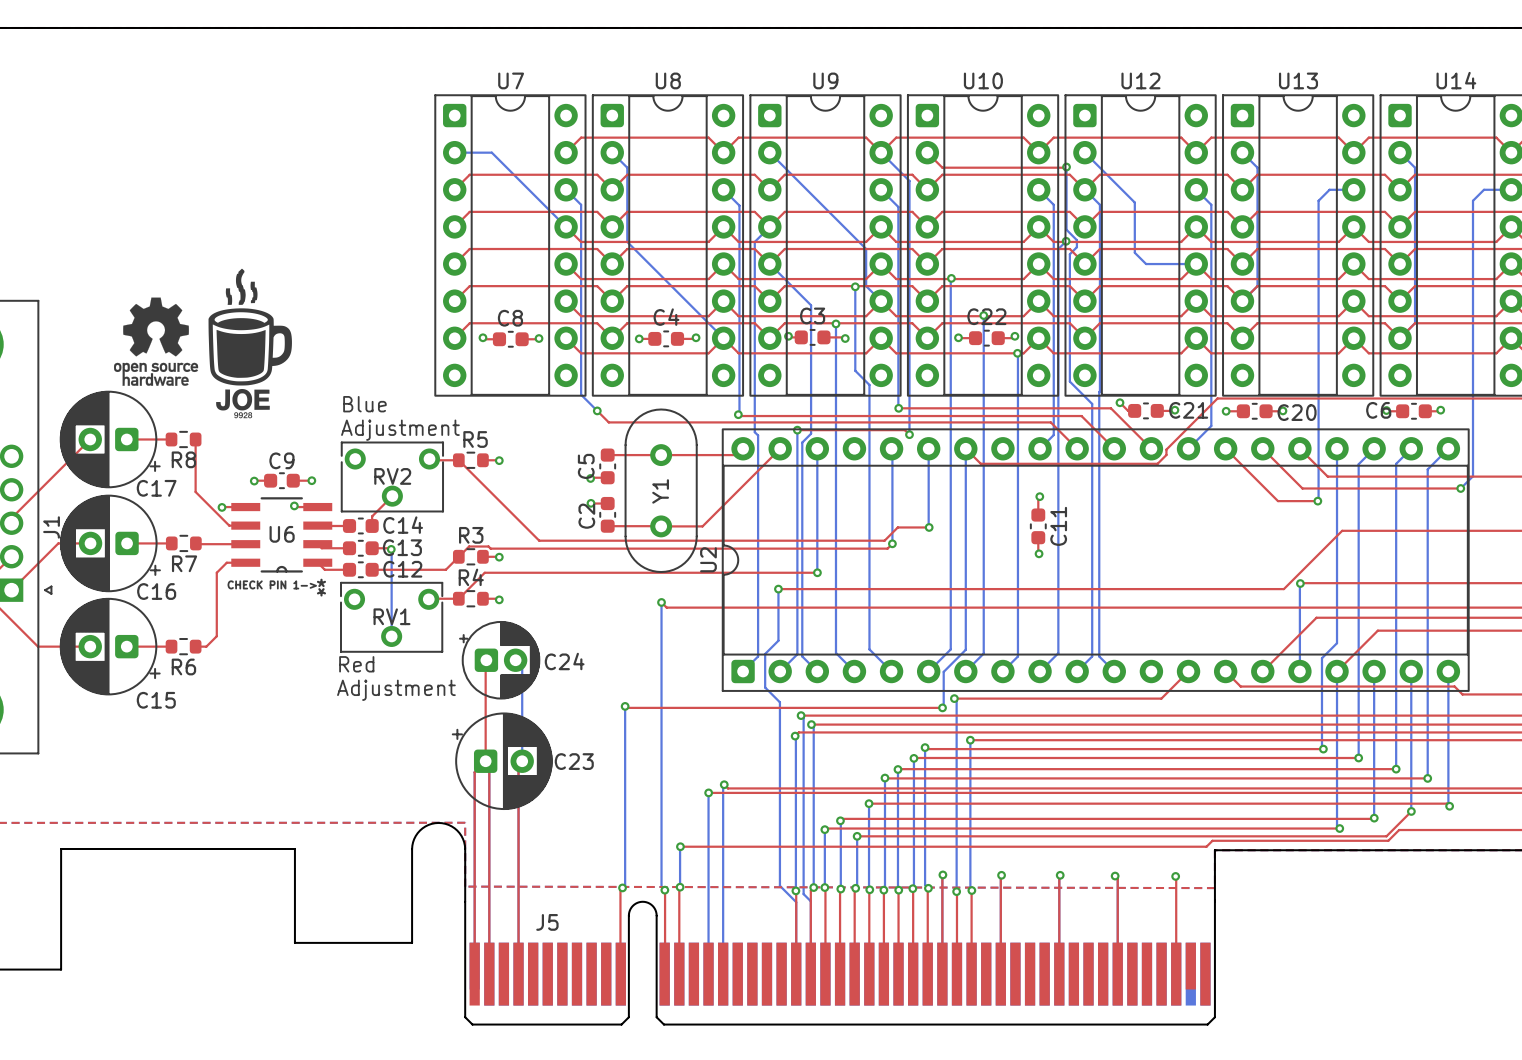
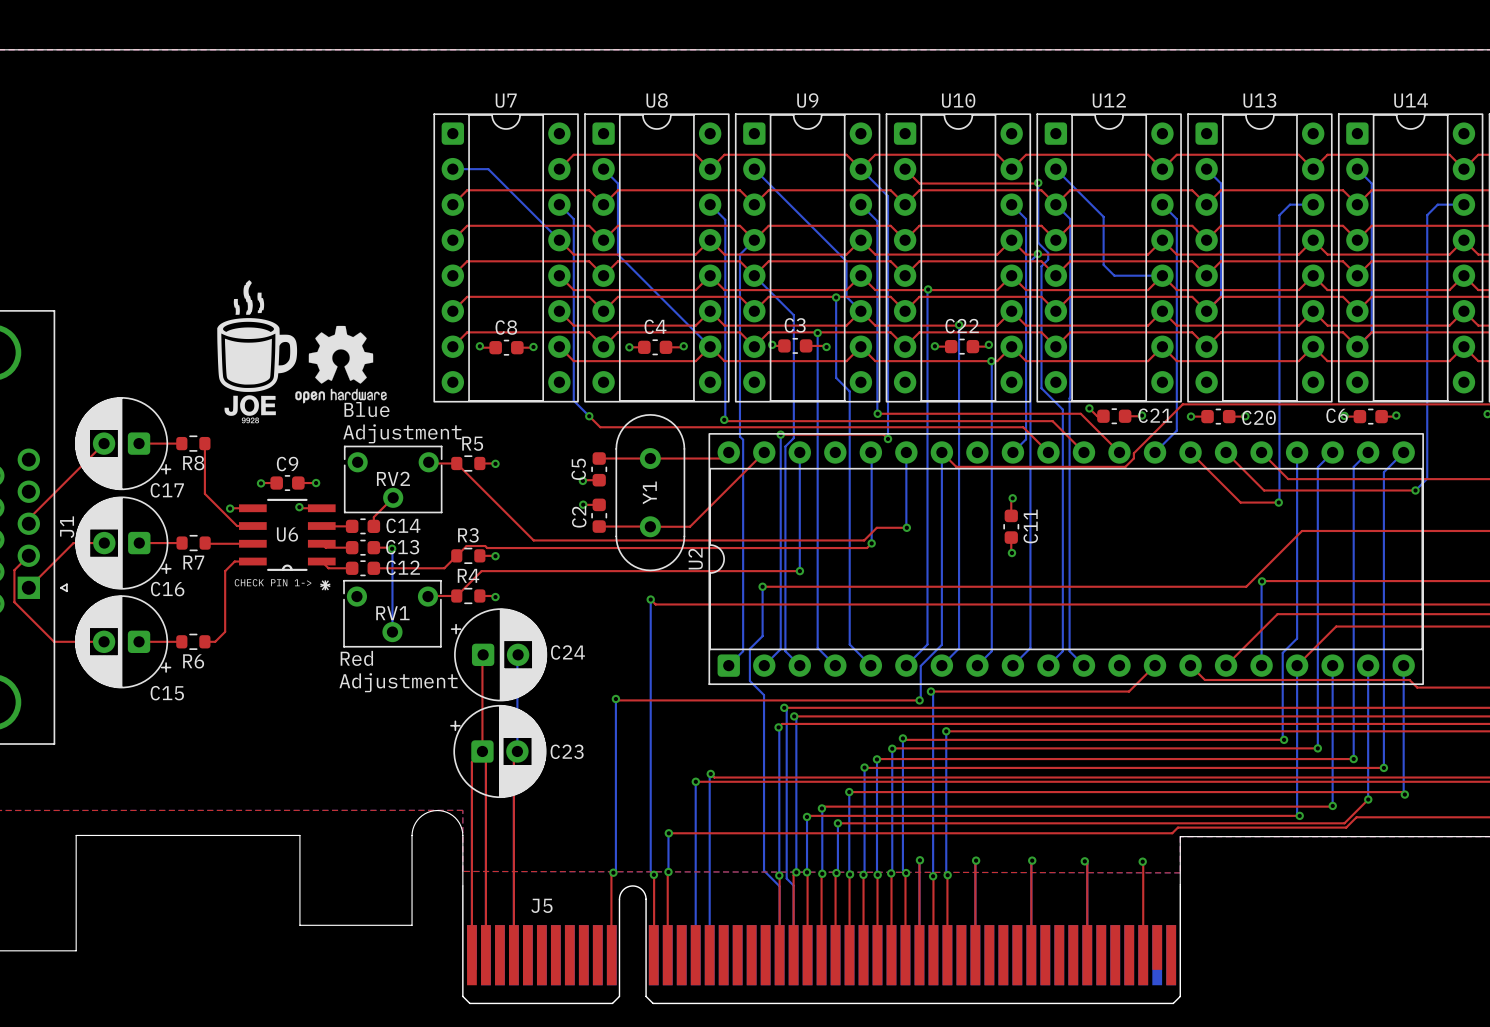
drawing: [113, 297, 199, 386] -> none
drawing: none -> [295, 325, 387, 404]
C24 footprint: [459, 621, 541, 700] -> [450, 608, 548, 702]

